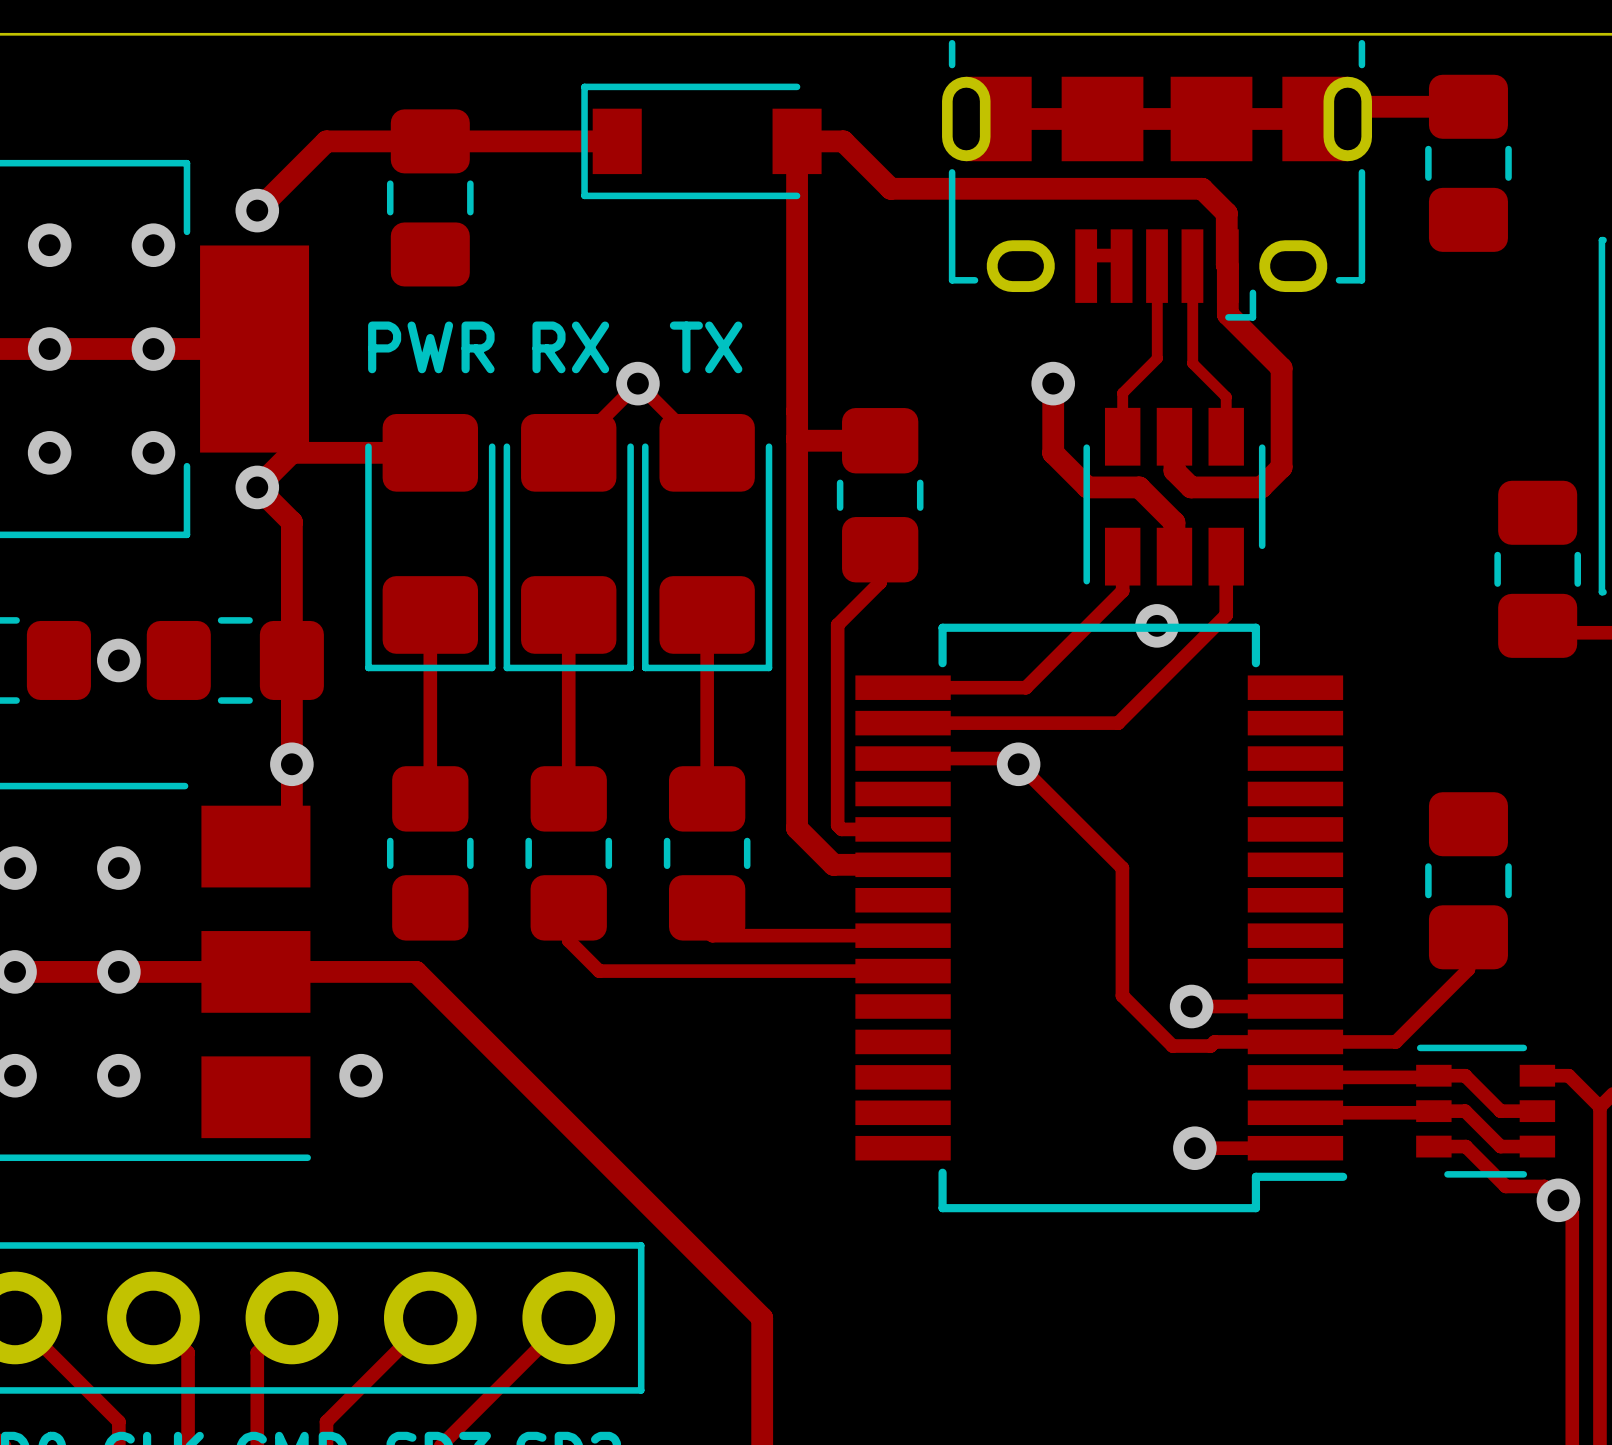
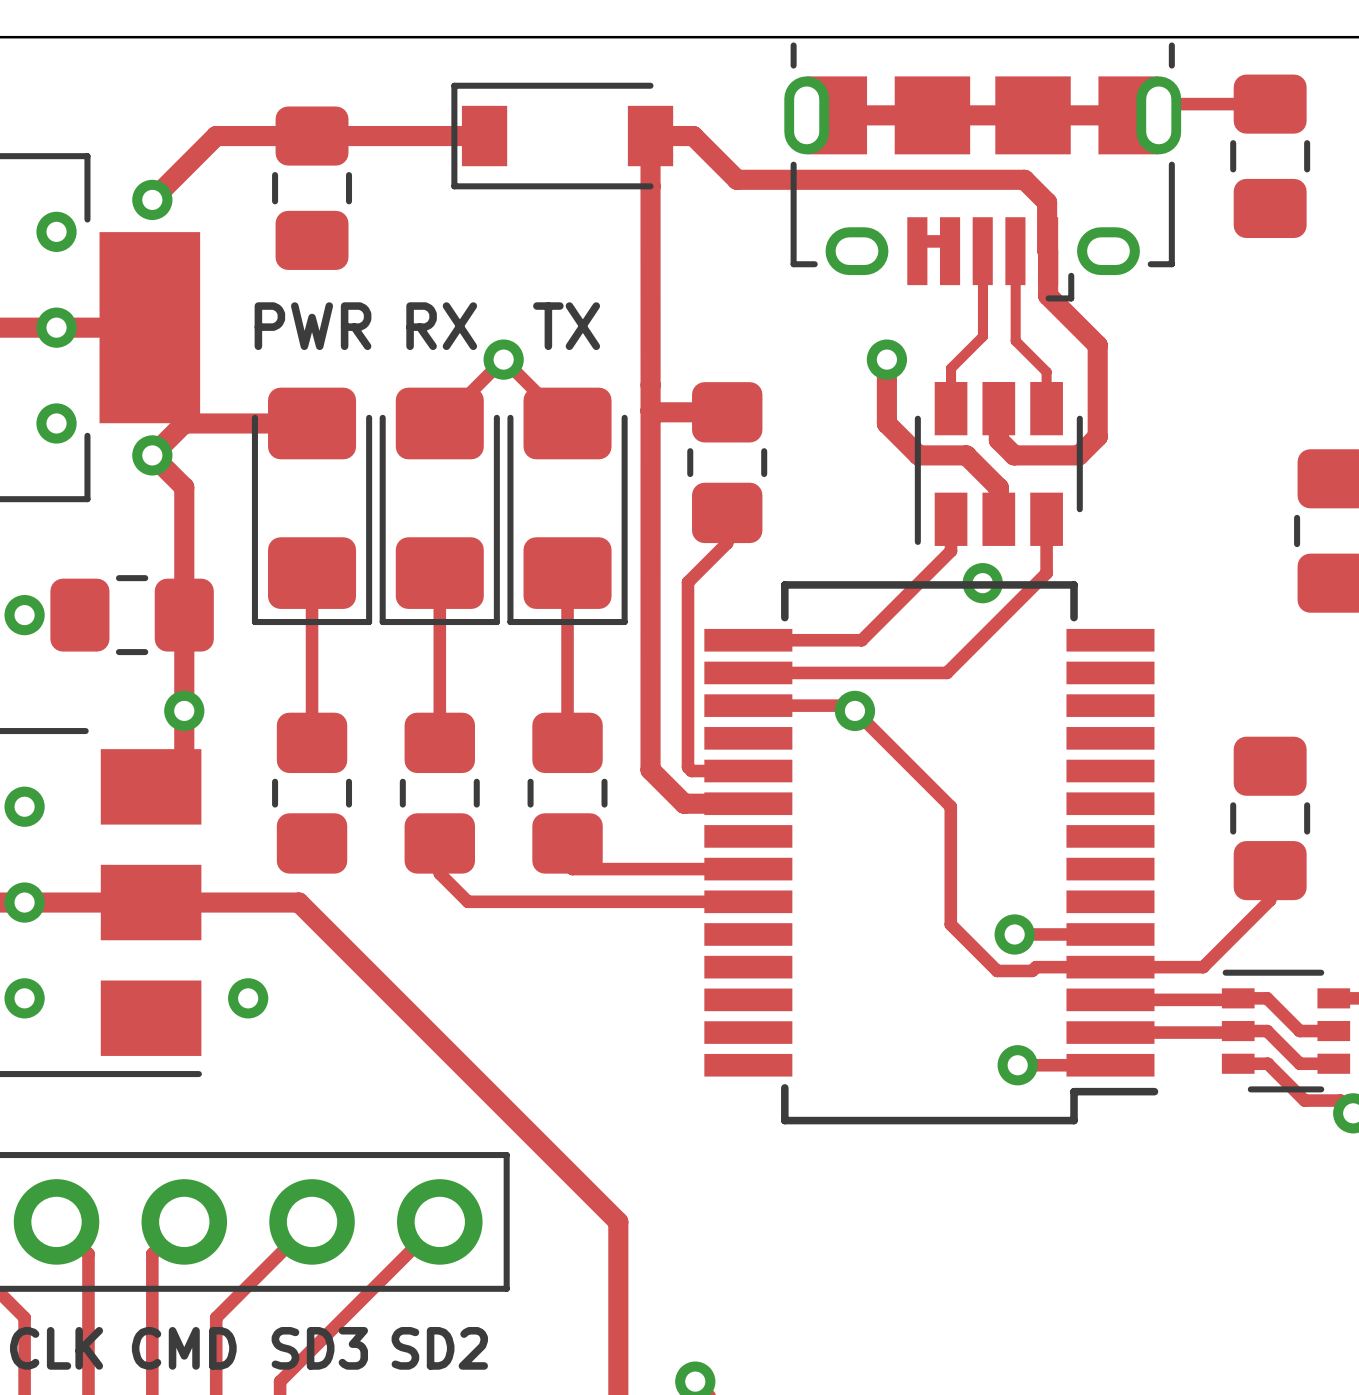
track width: thick (1468, 106) (1359, 106) (1347, 118) -> thin (1270, 104) (1170, 104) (1158, 115)

